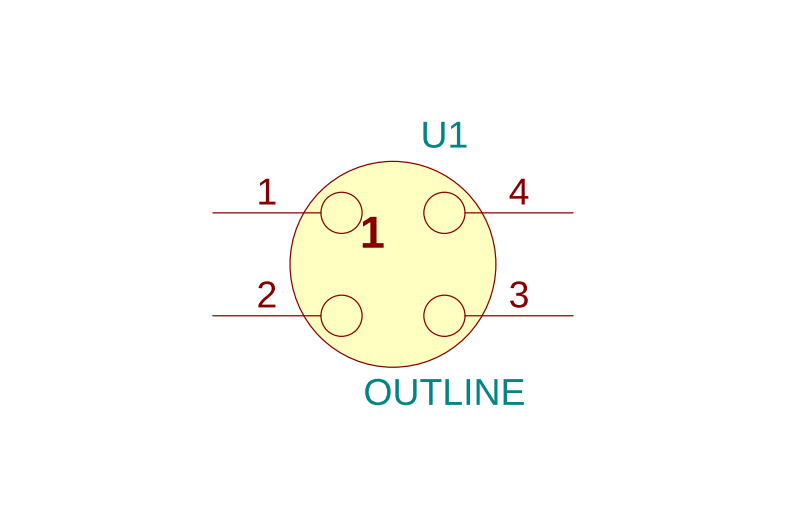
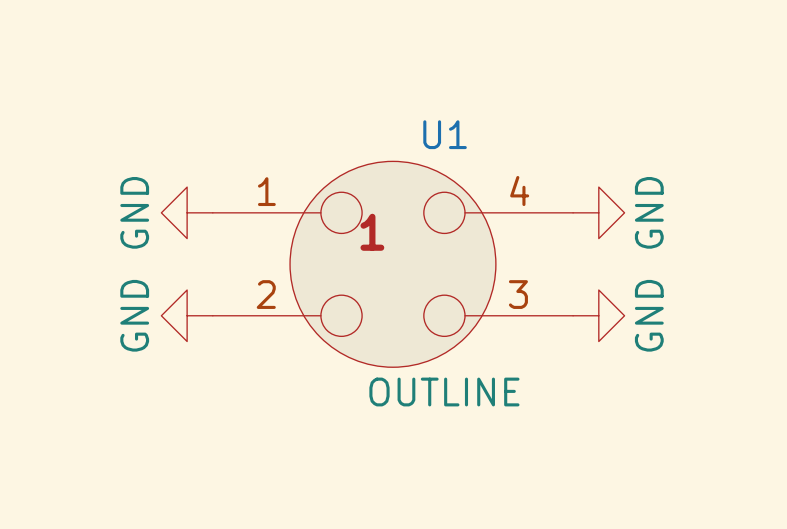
power symbol: none -> GND (187, 212)
power symbol: none -> GND (598, 212)
power symbol: none -> GND (187, 315)
power symbol: none -> GND (598, 315)

